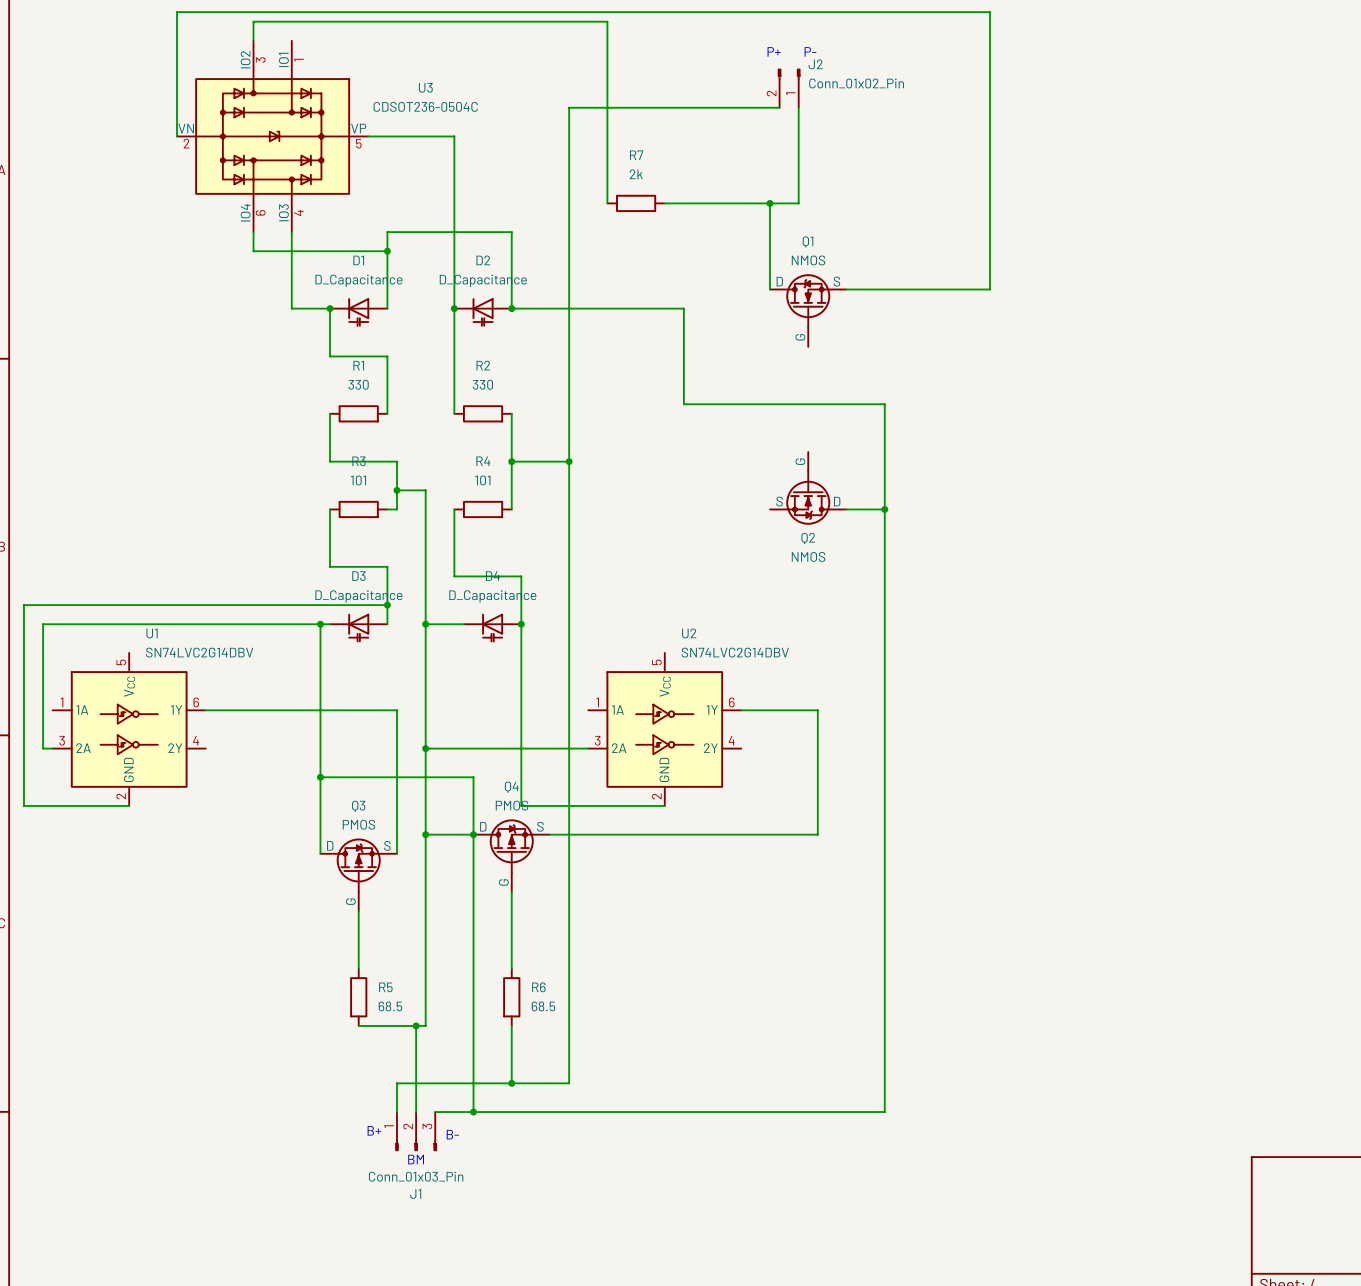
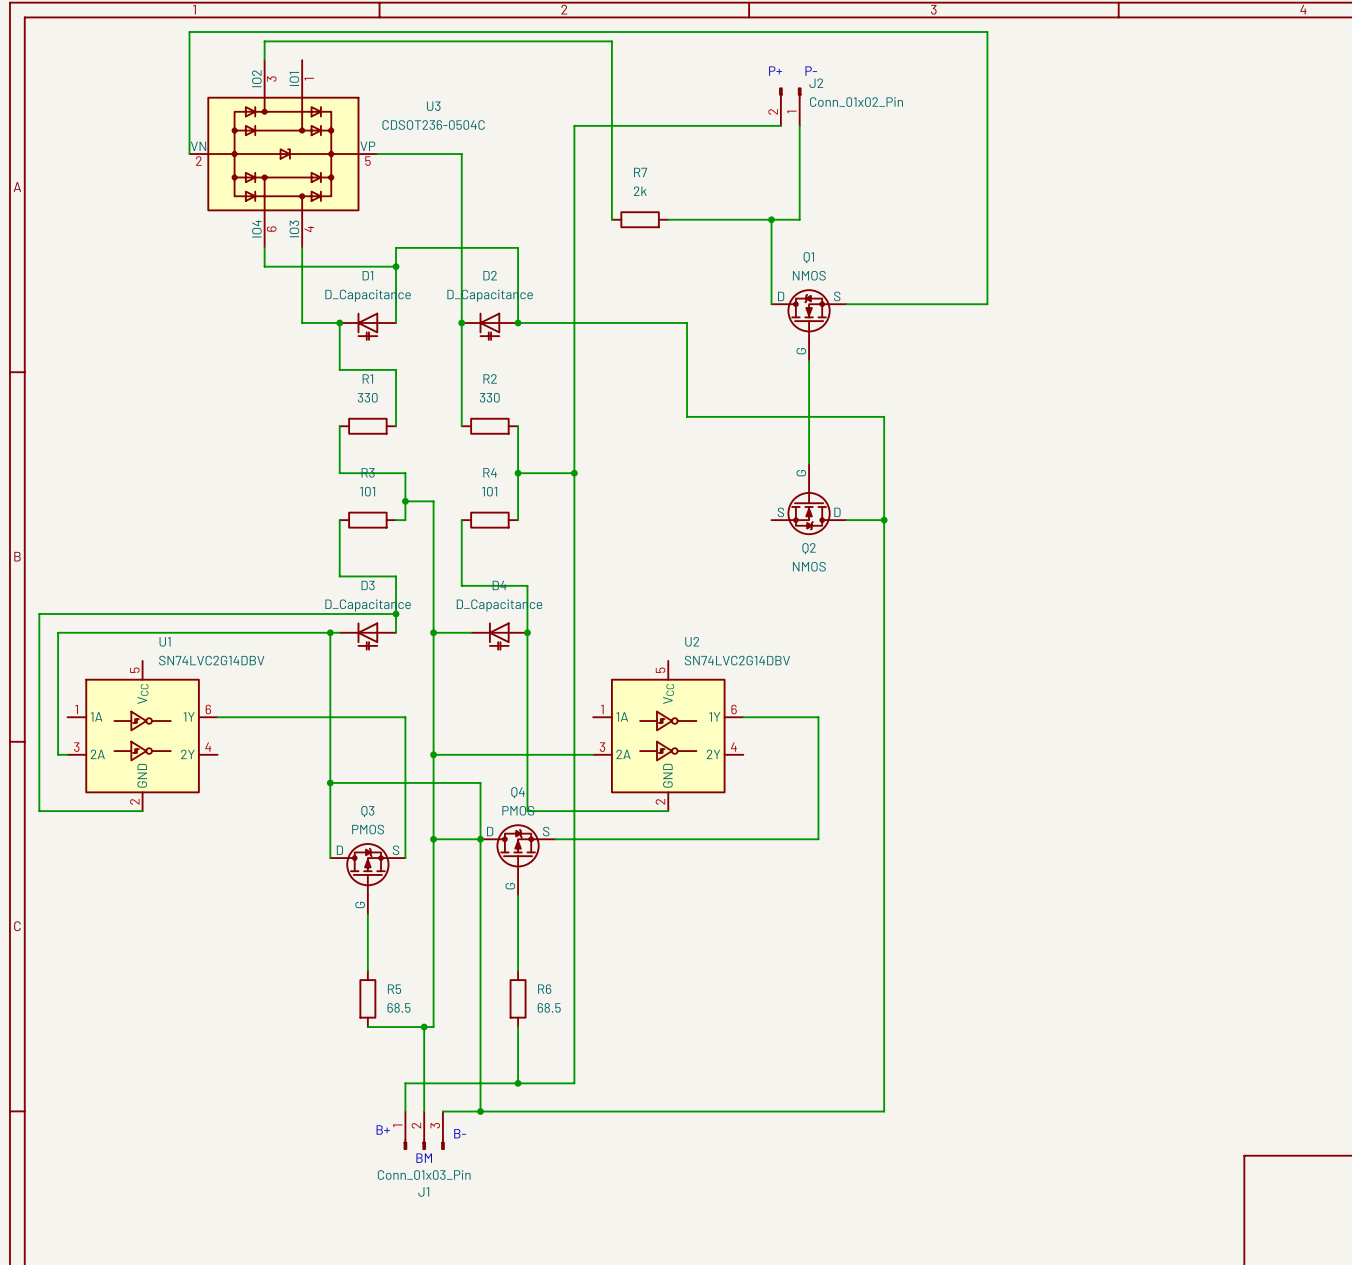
wire: none -> (809, 360) (809, 463)

